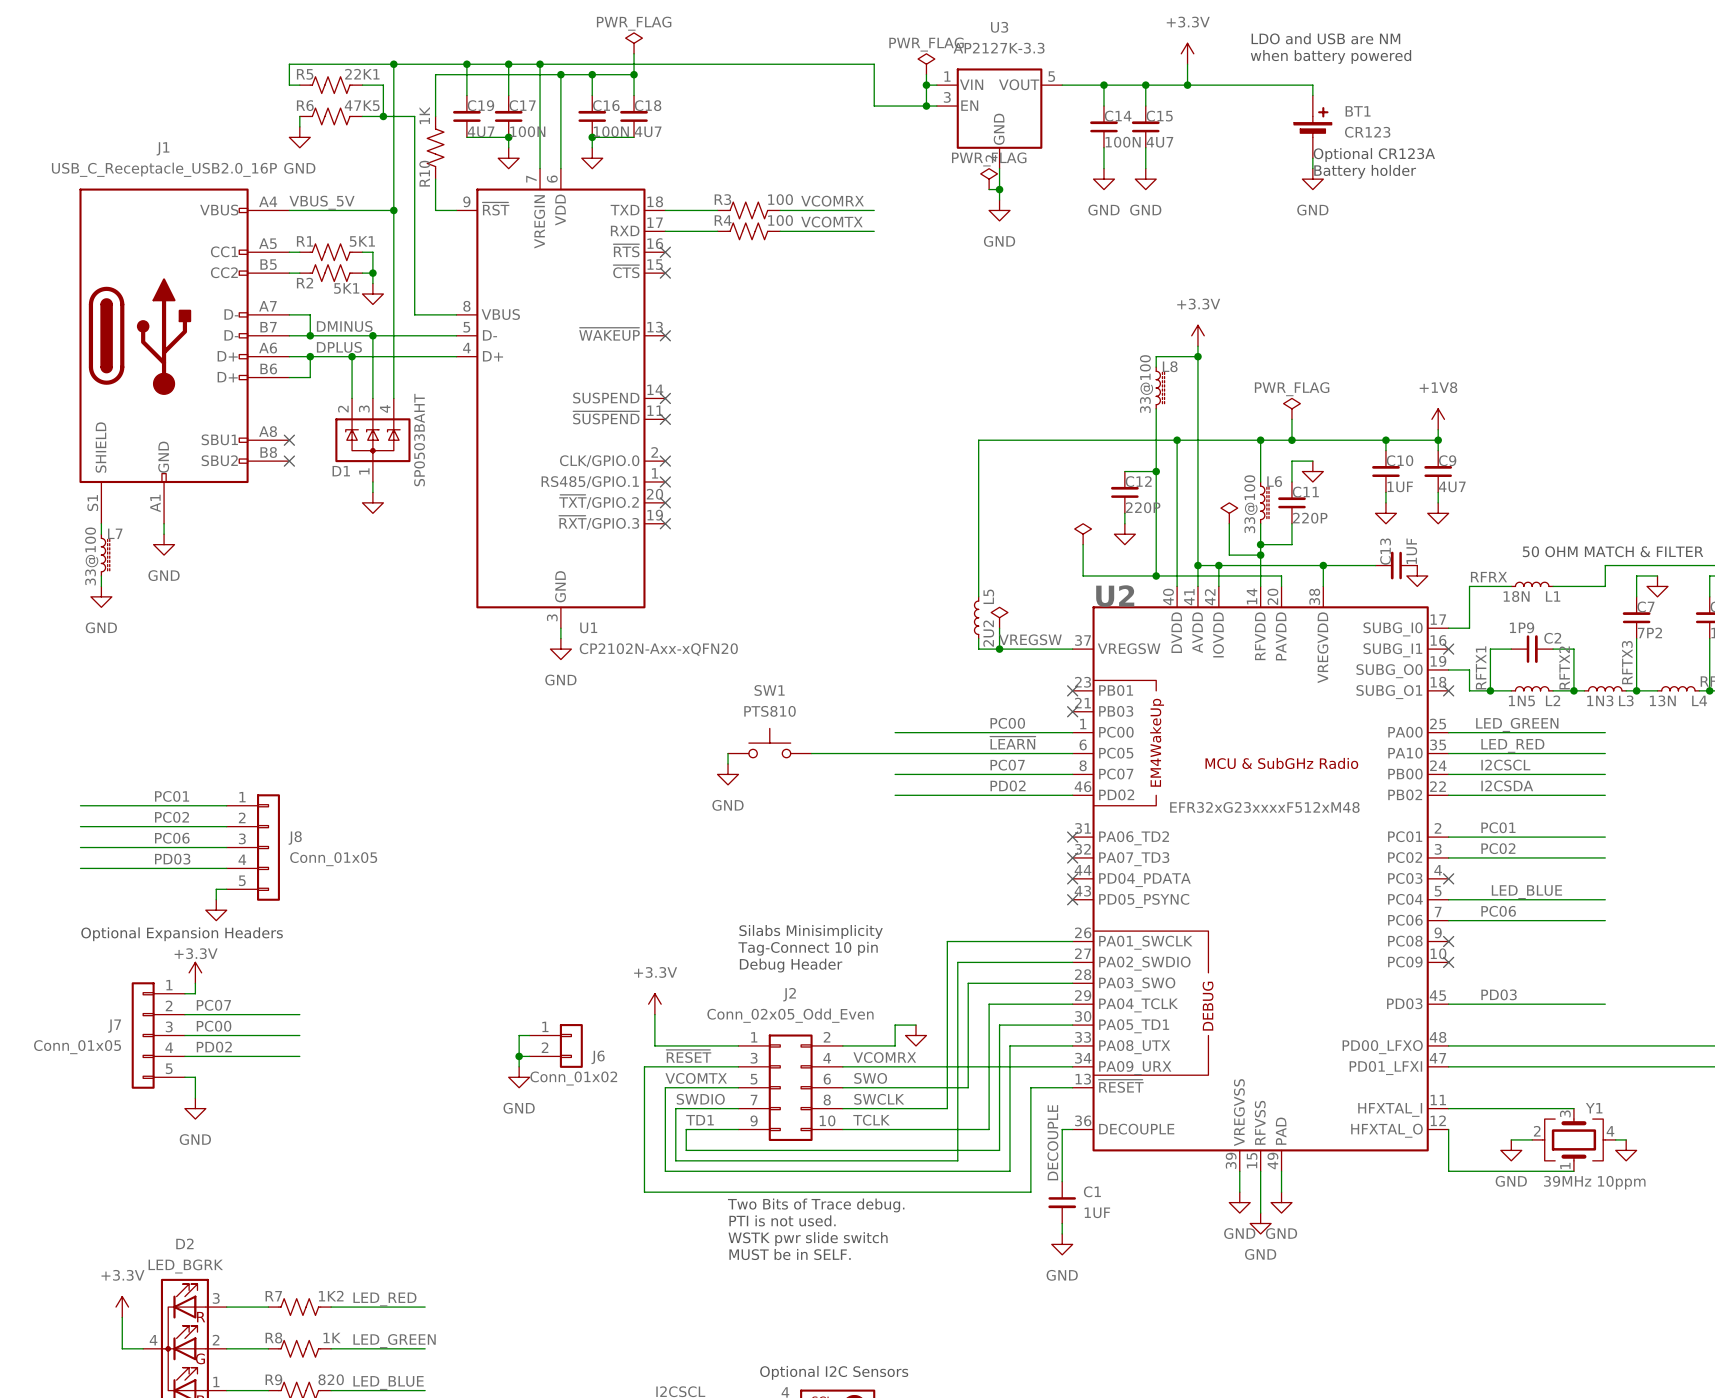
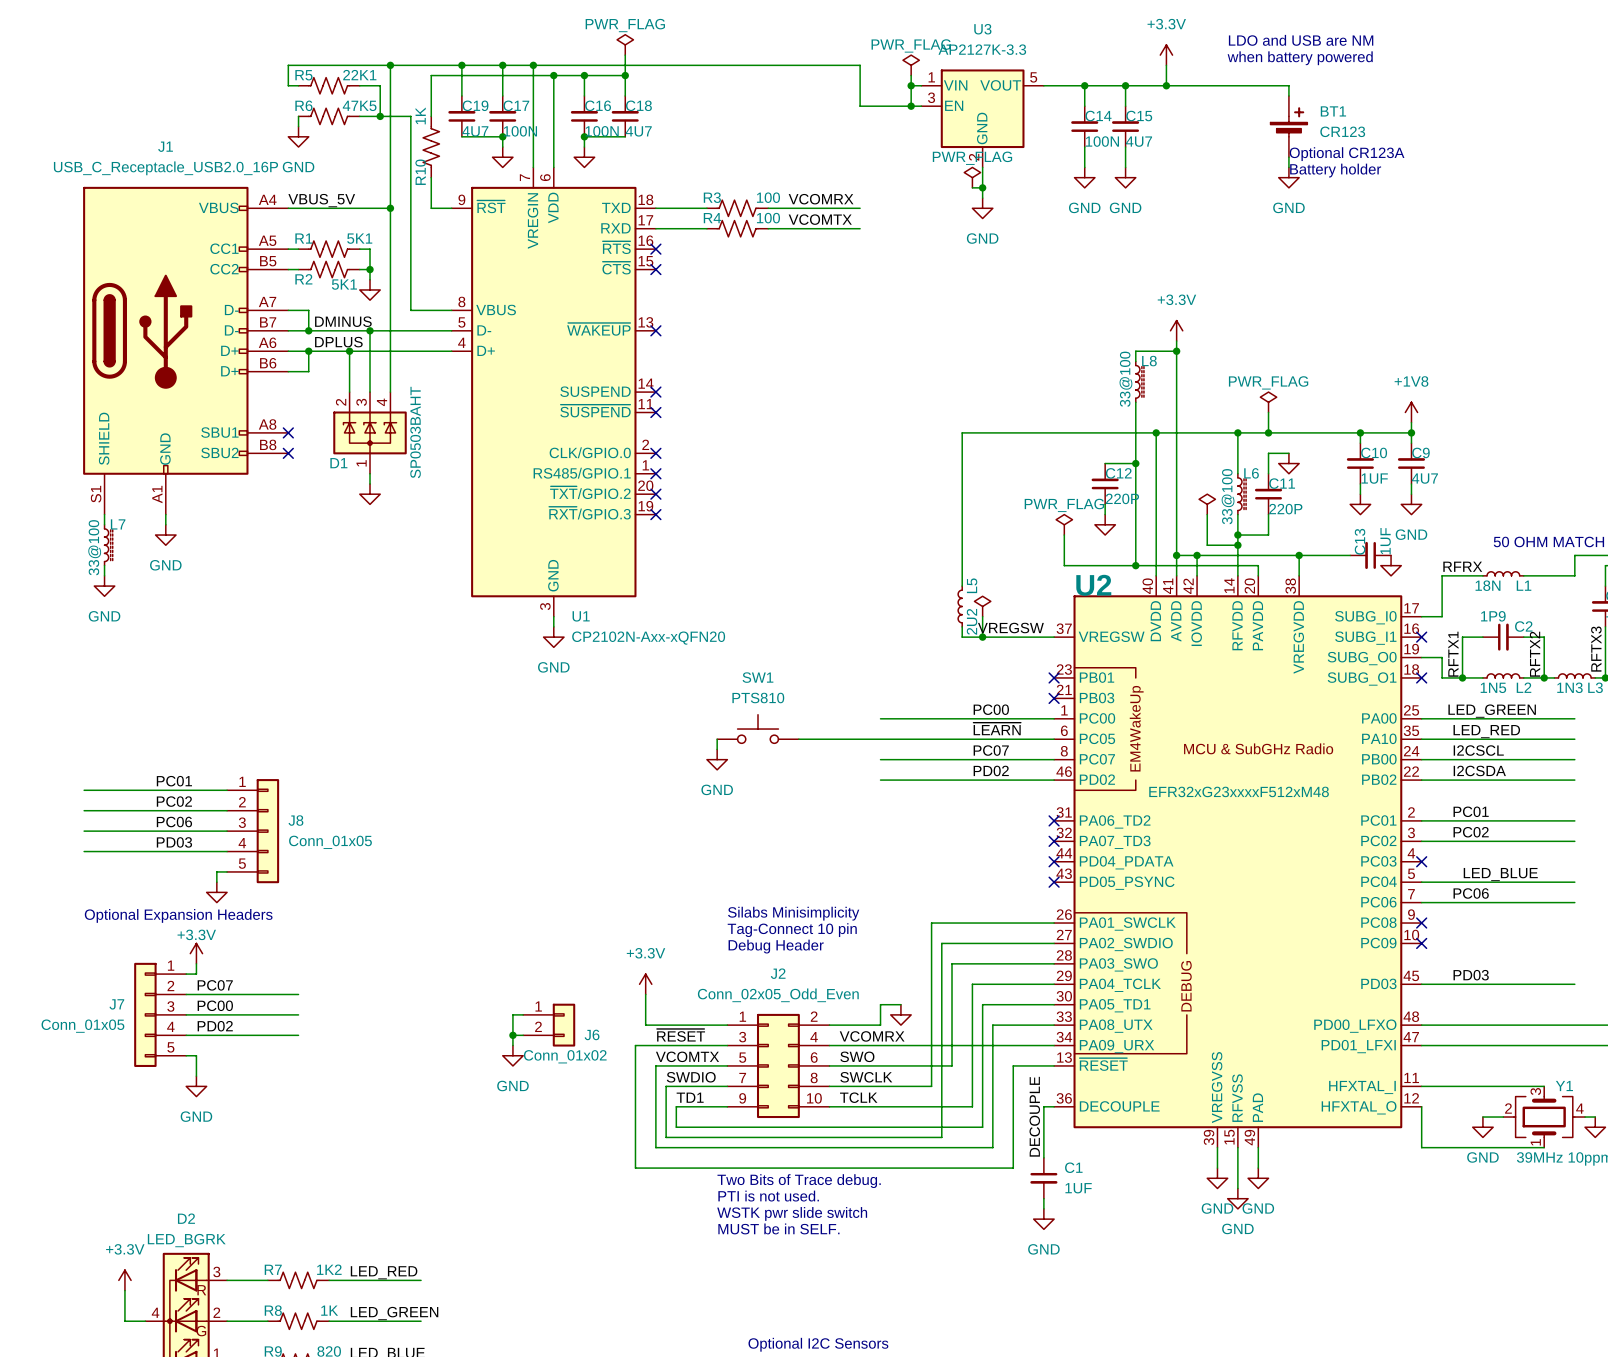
power symbol text: none -> PWR_FLAG (1064, 505)
power symbol text: none -> GND (1411, 534)

